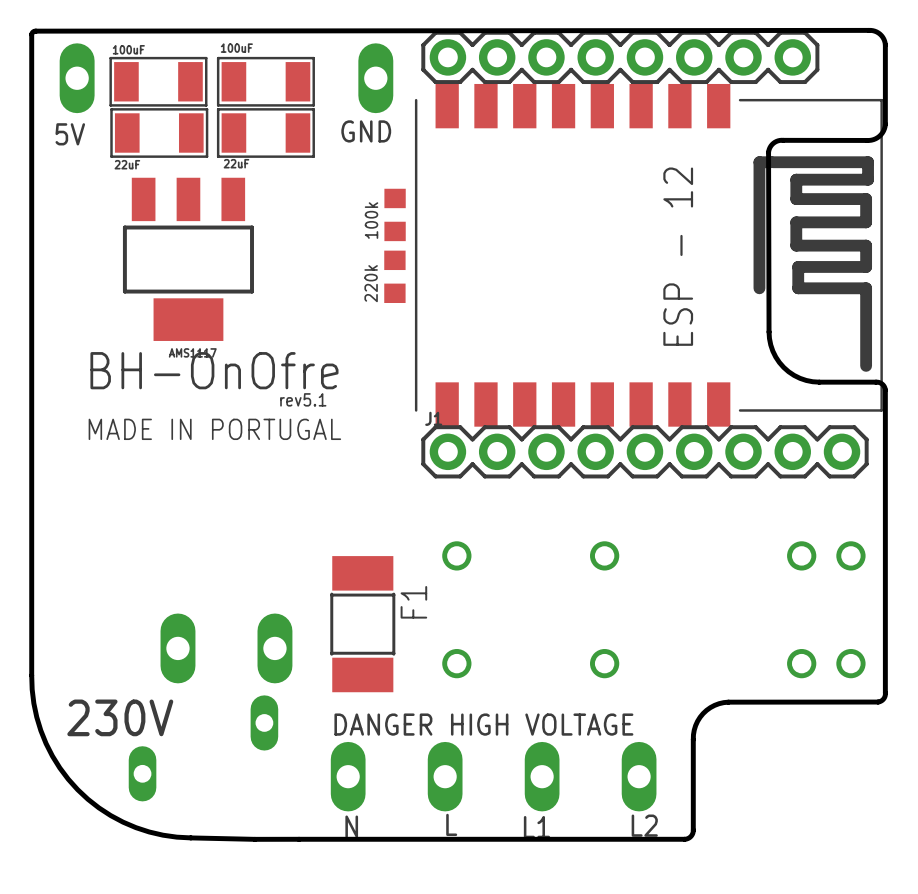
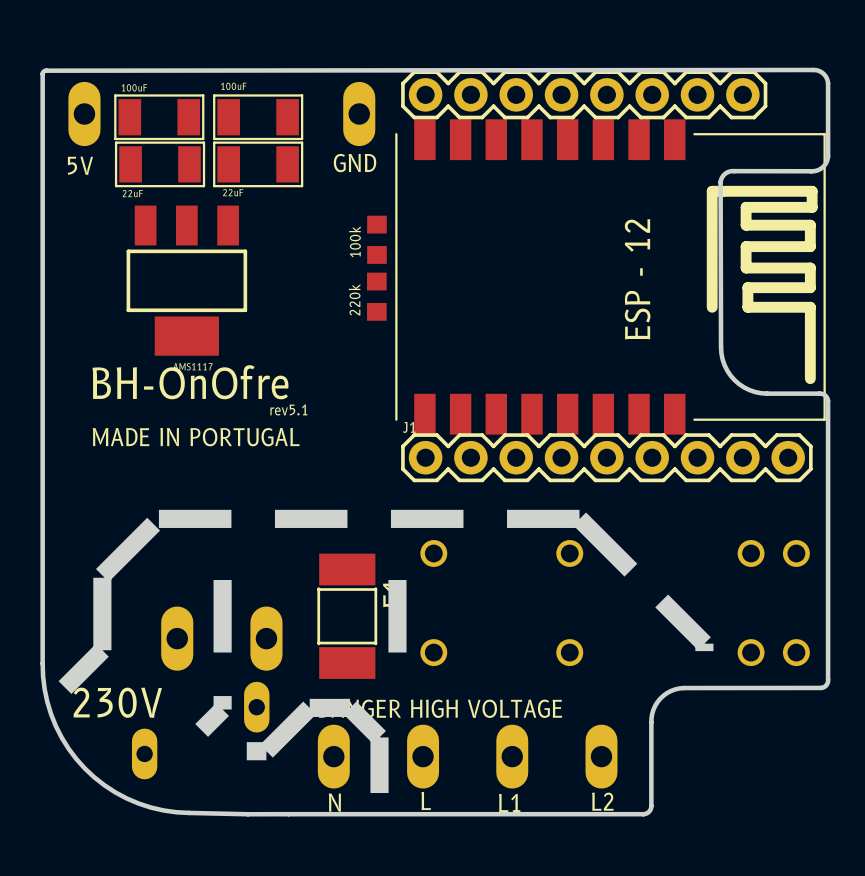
board edge: none -> (222, 580) (222, 709) (201, 730)
board edge: none -> (397, 580) (397, 666)
board edge: none -> (704, 651) (704, 643) (579, 518) (158, 518) (102, 575) (102, 650) (65, 687)
board edge: none -> (246, 751) (266, 751) (309, 707) (350, 707) (379, 737) (379, 793)

